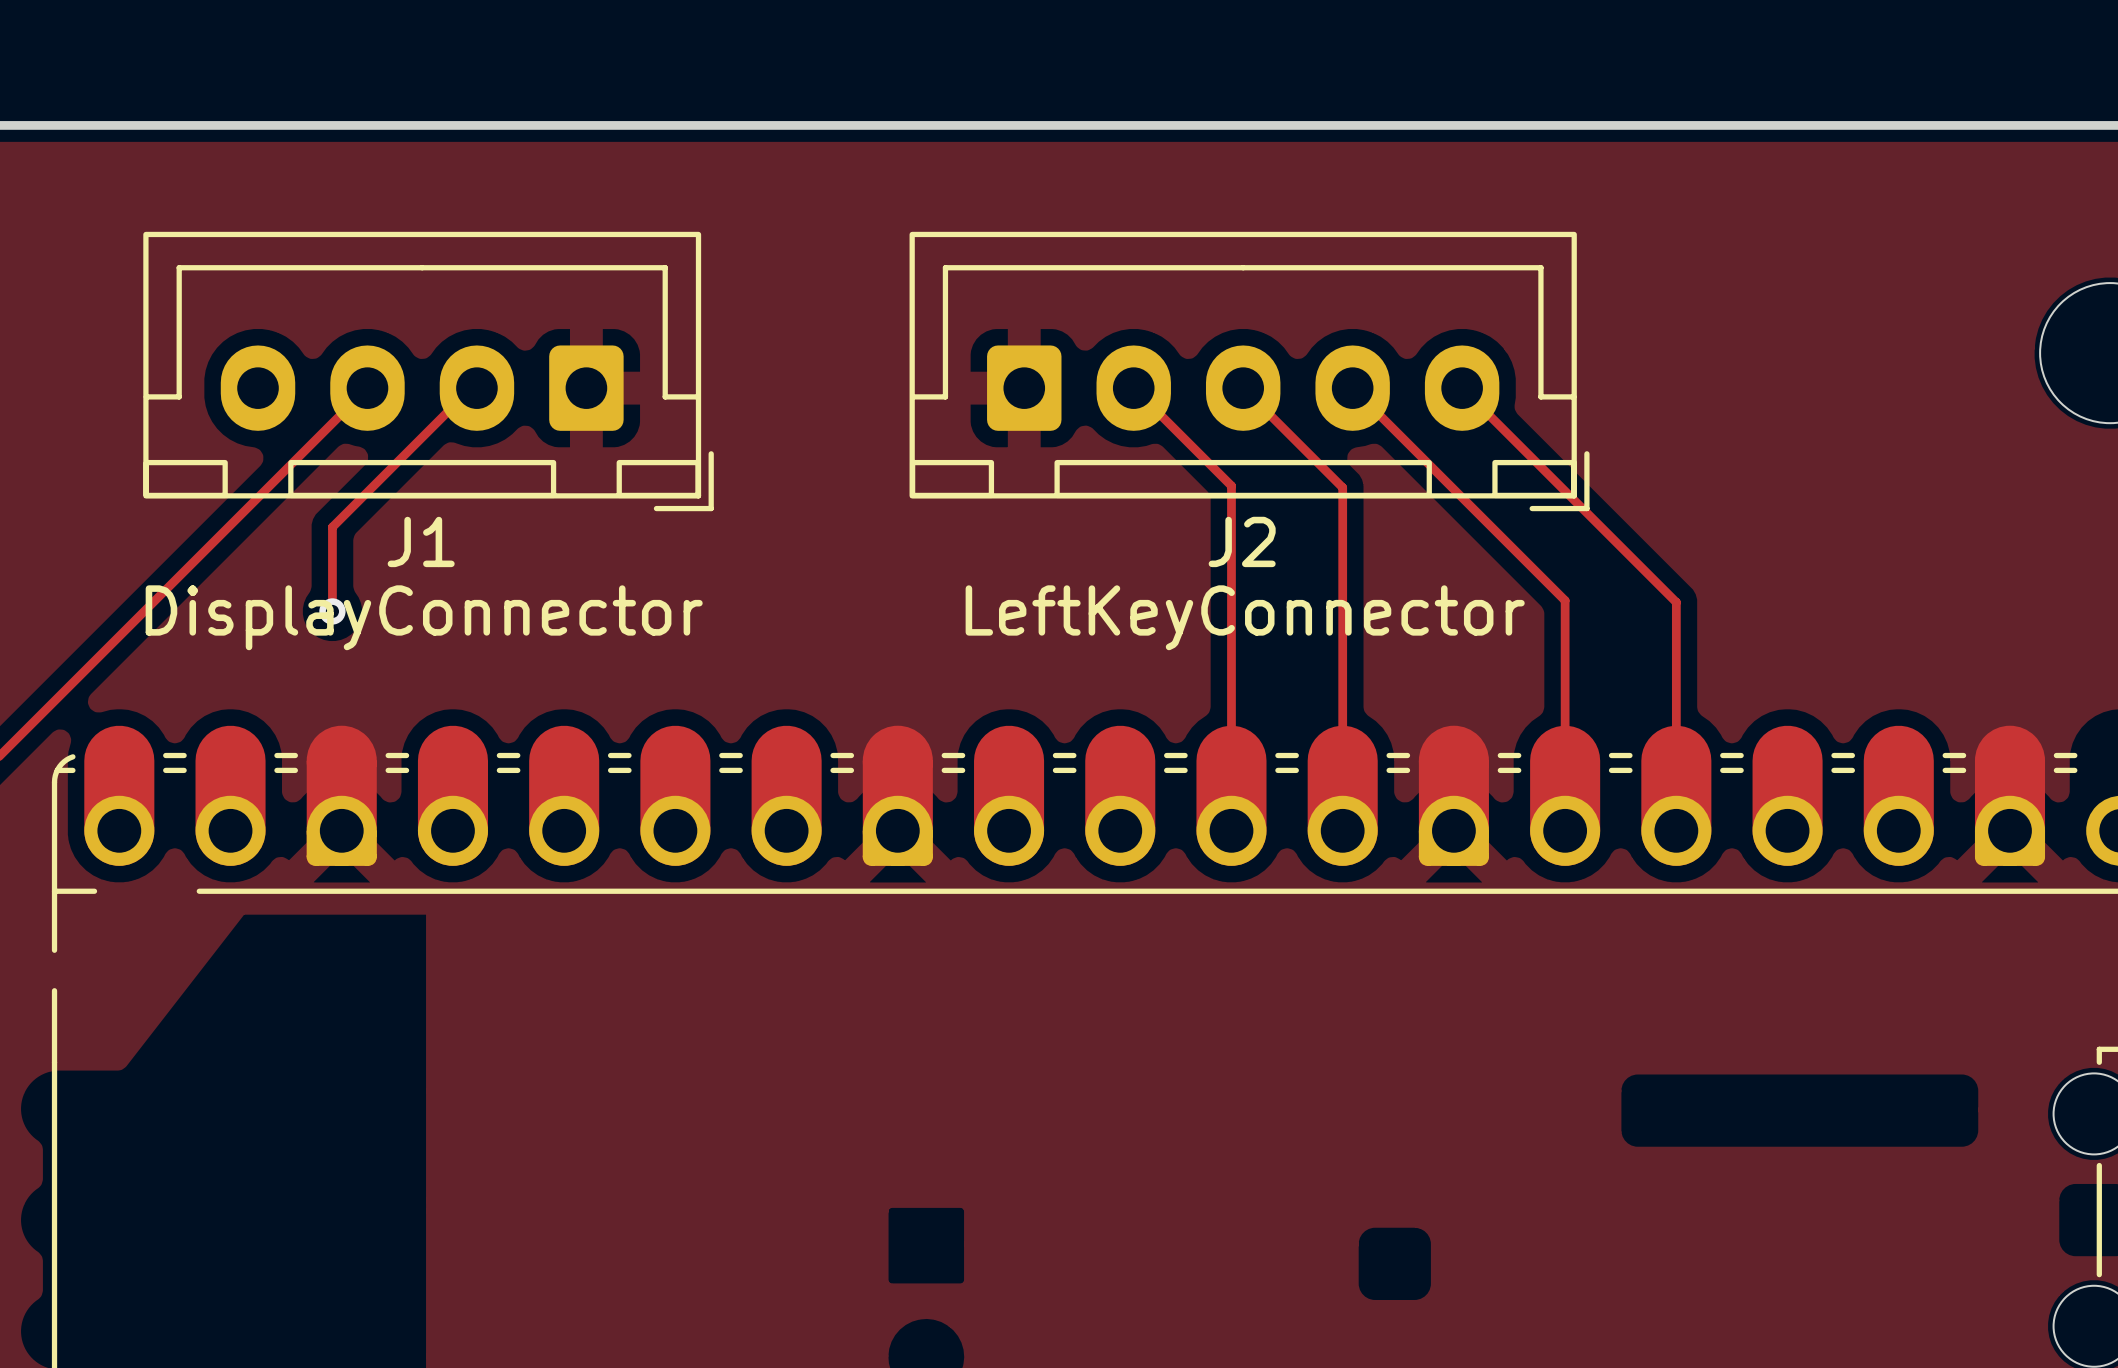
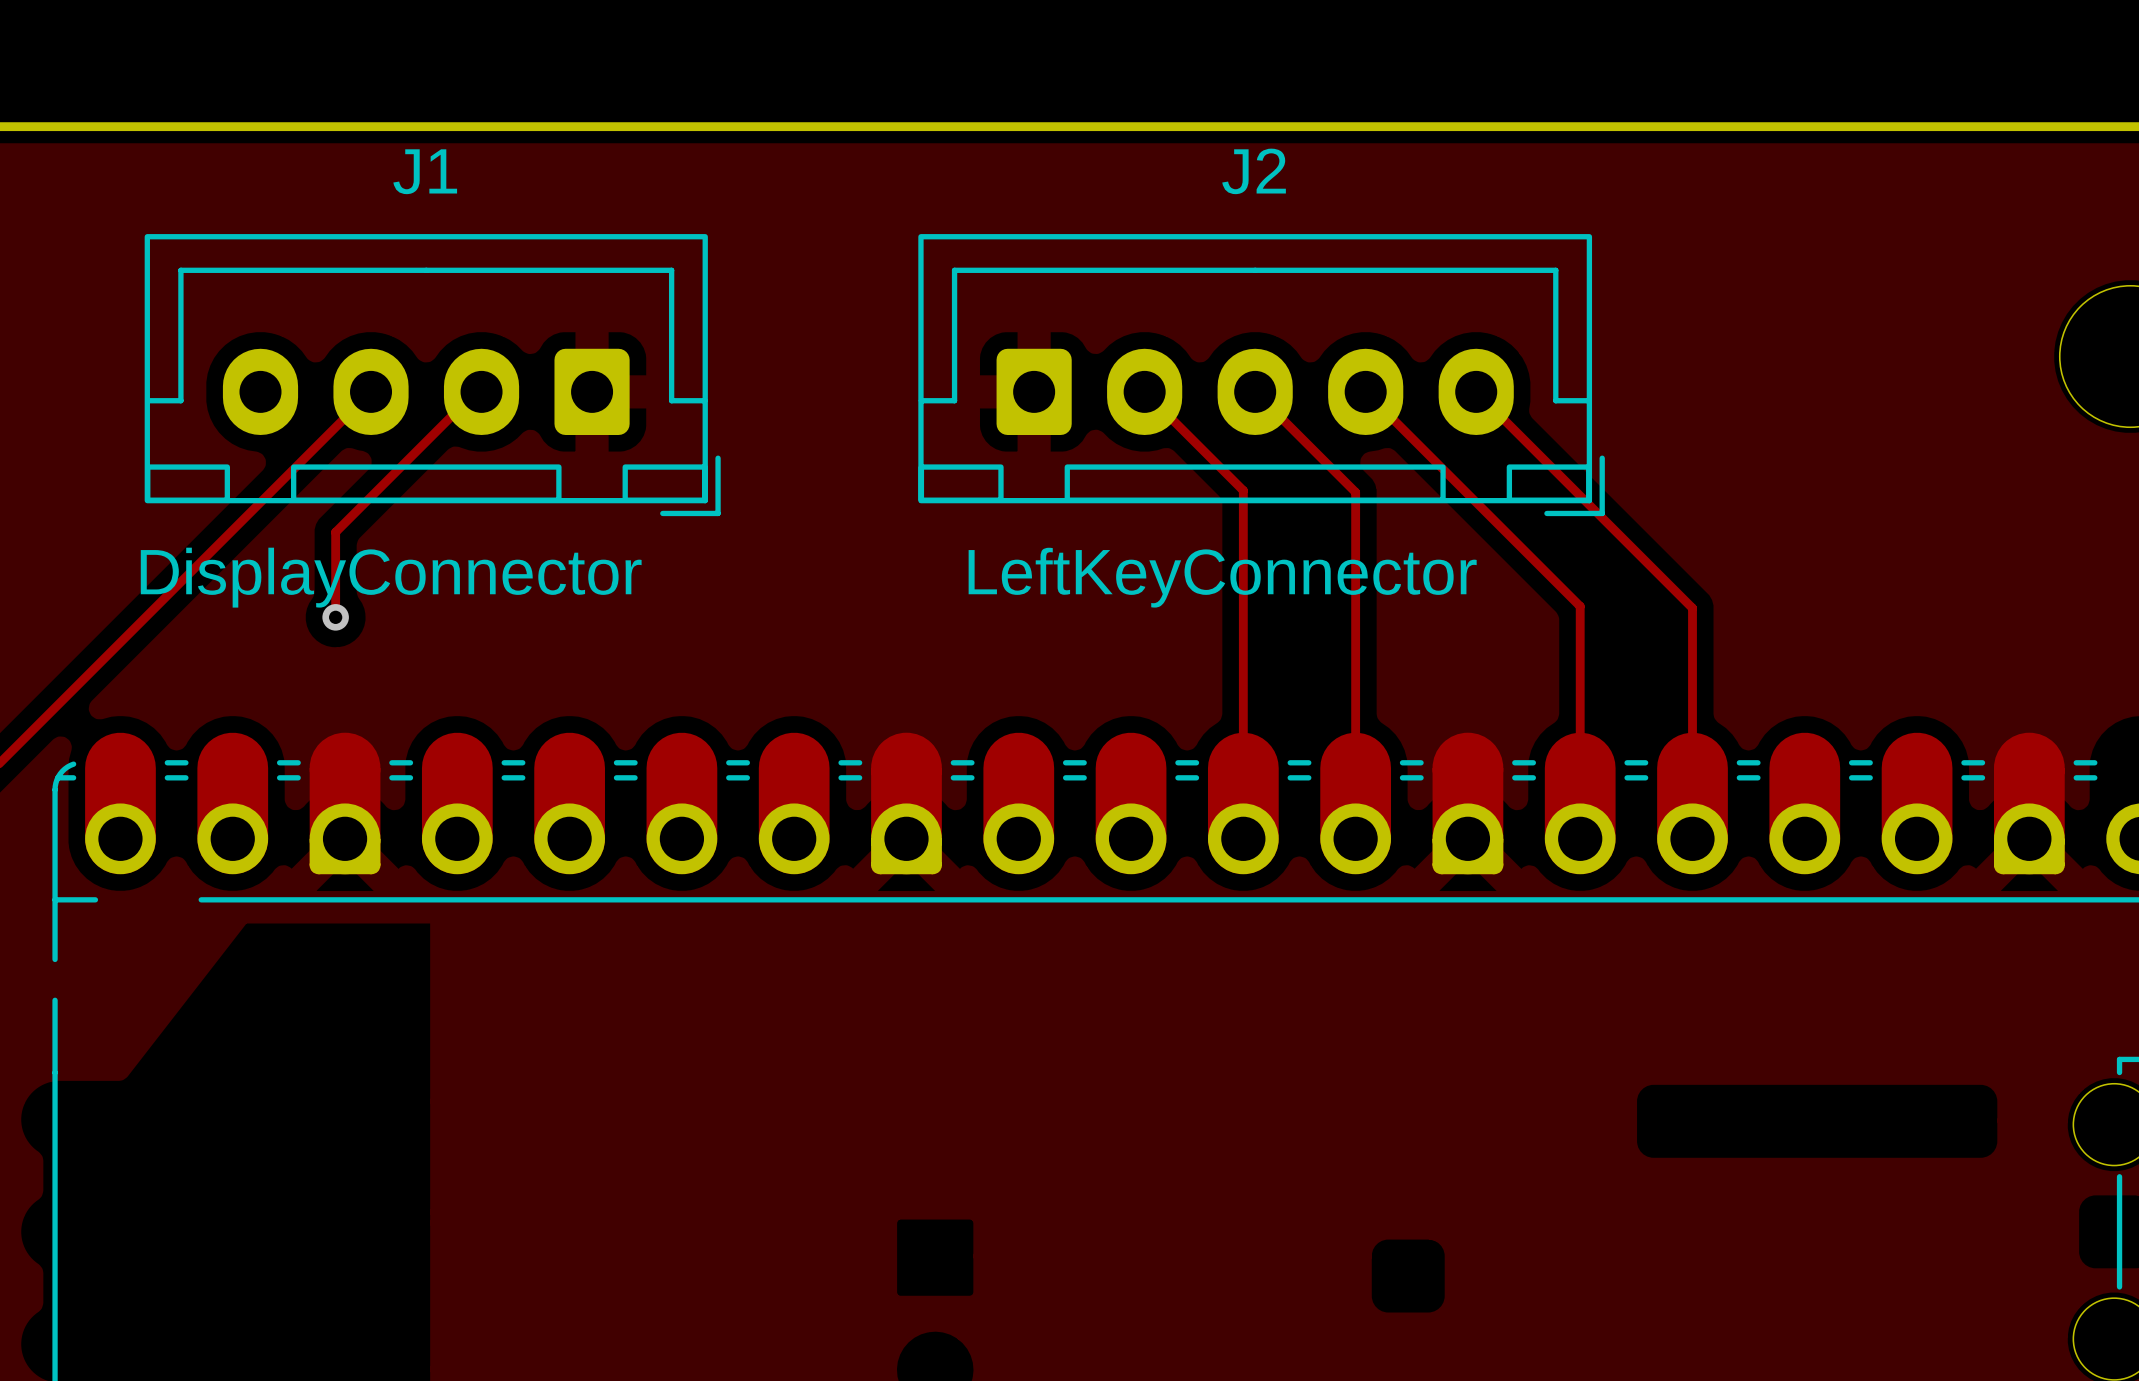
J1 name position: J1 (421, 541) -> J1 (425, 171)
J2 name position: J2 (1242, 541) -> J2 (1254, 171)
text position: DisplayConnector (424, 617) -> DisplayConnector (391, 577)
text position: LeftKeyConnector (1245, 617) -> LeftKeyConnector (1222, 577)

